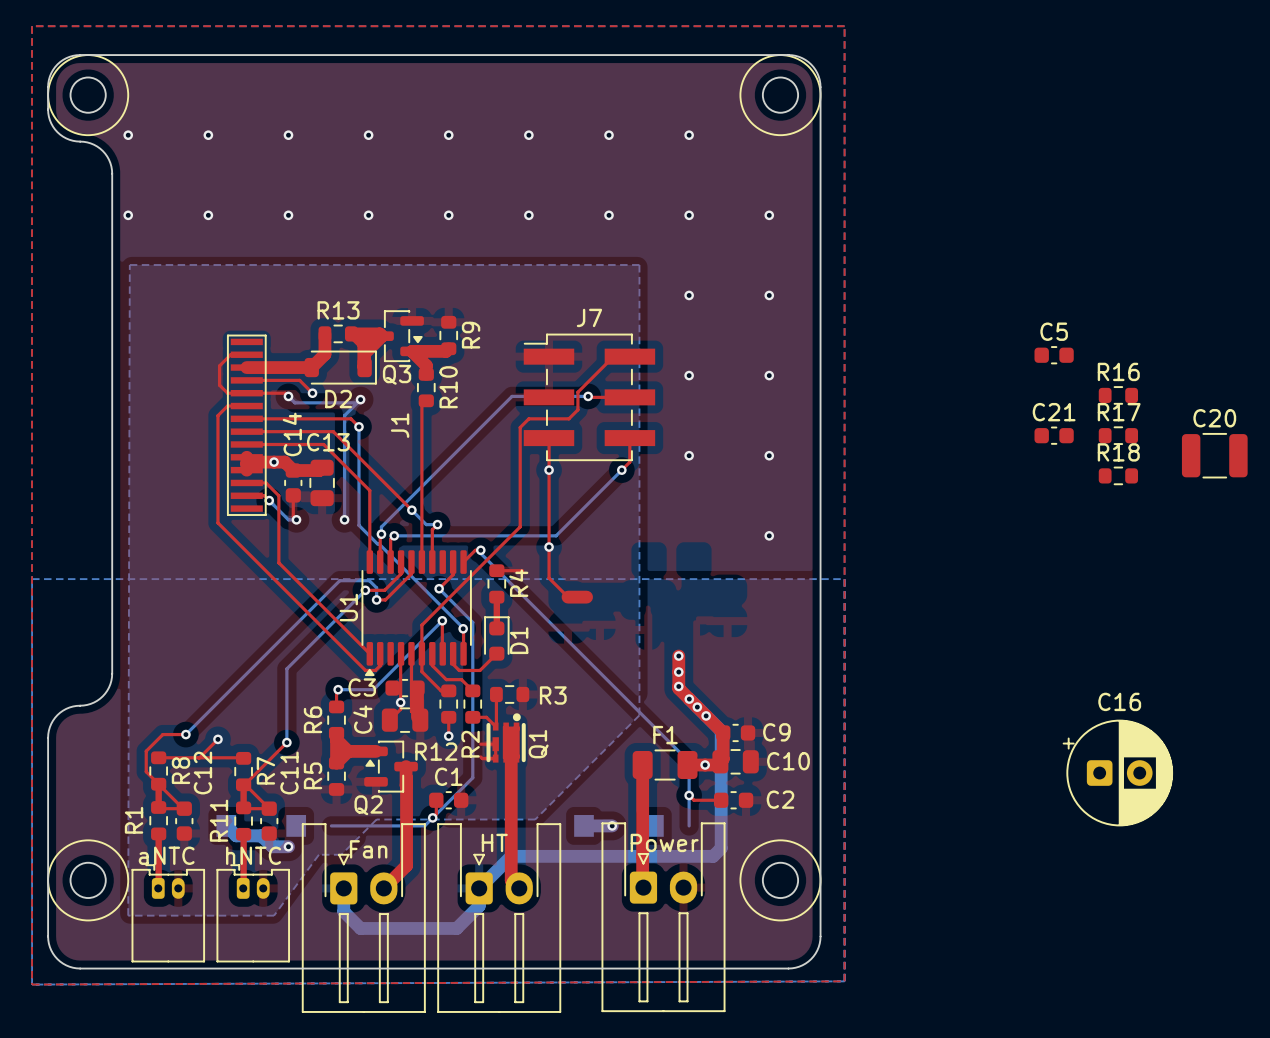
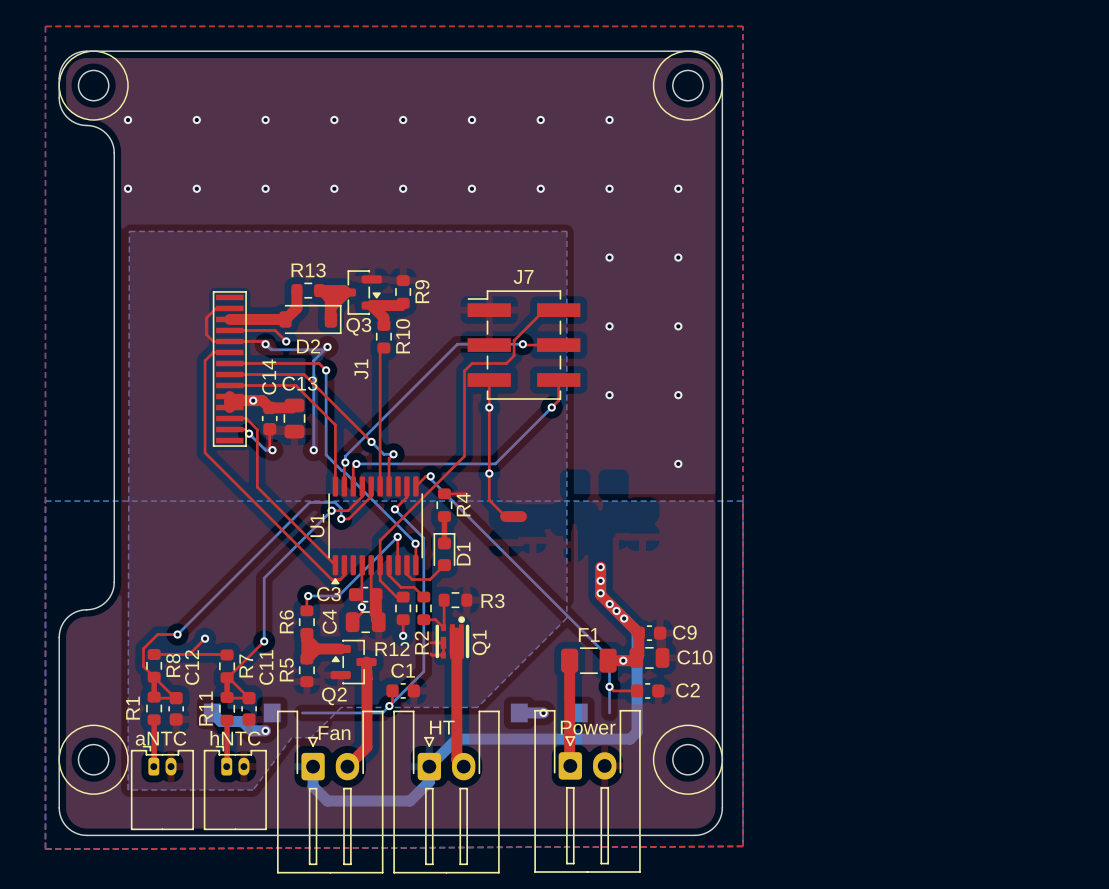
C5: (1054, 355) -> none
R16: (1118, 395) -> none
C21: (1054, 435) -> none
R17: (1118, 435) -> none
C20: (1214, 455) -> none
R18: (1118, 475) -> none
C16: (1117, 773) -> none

